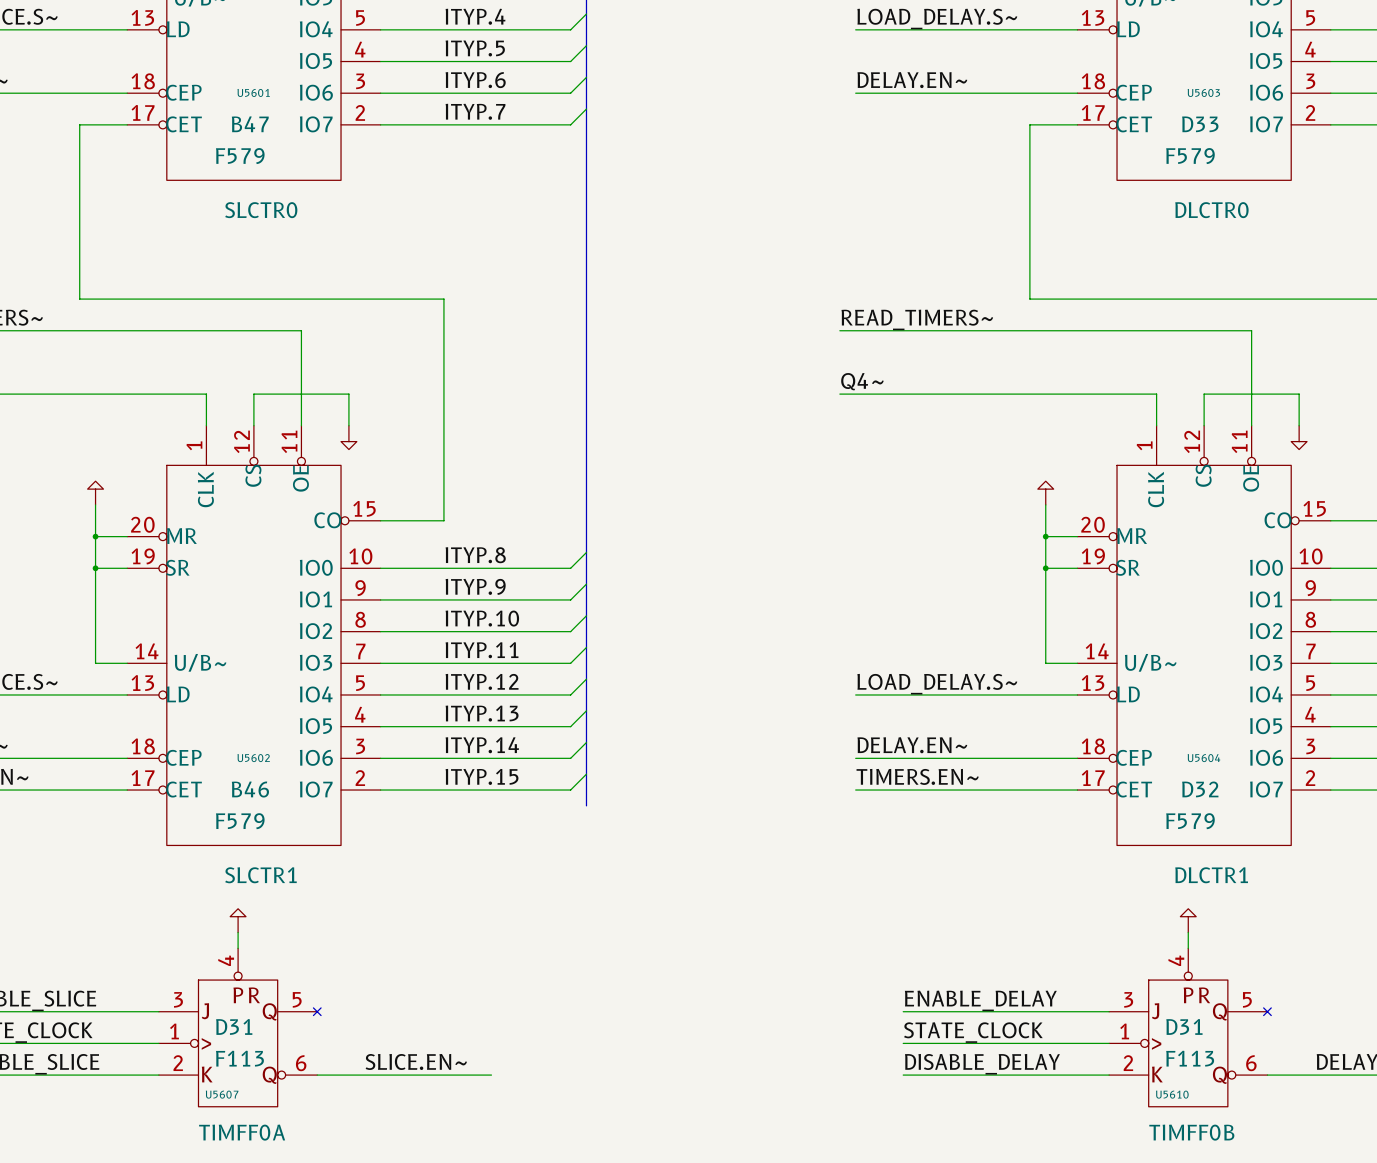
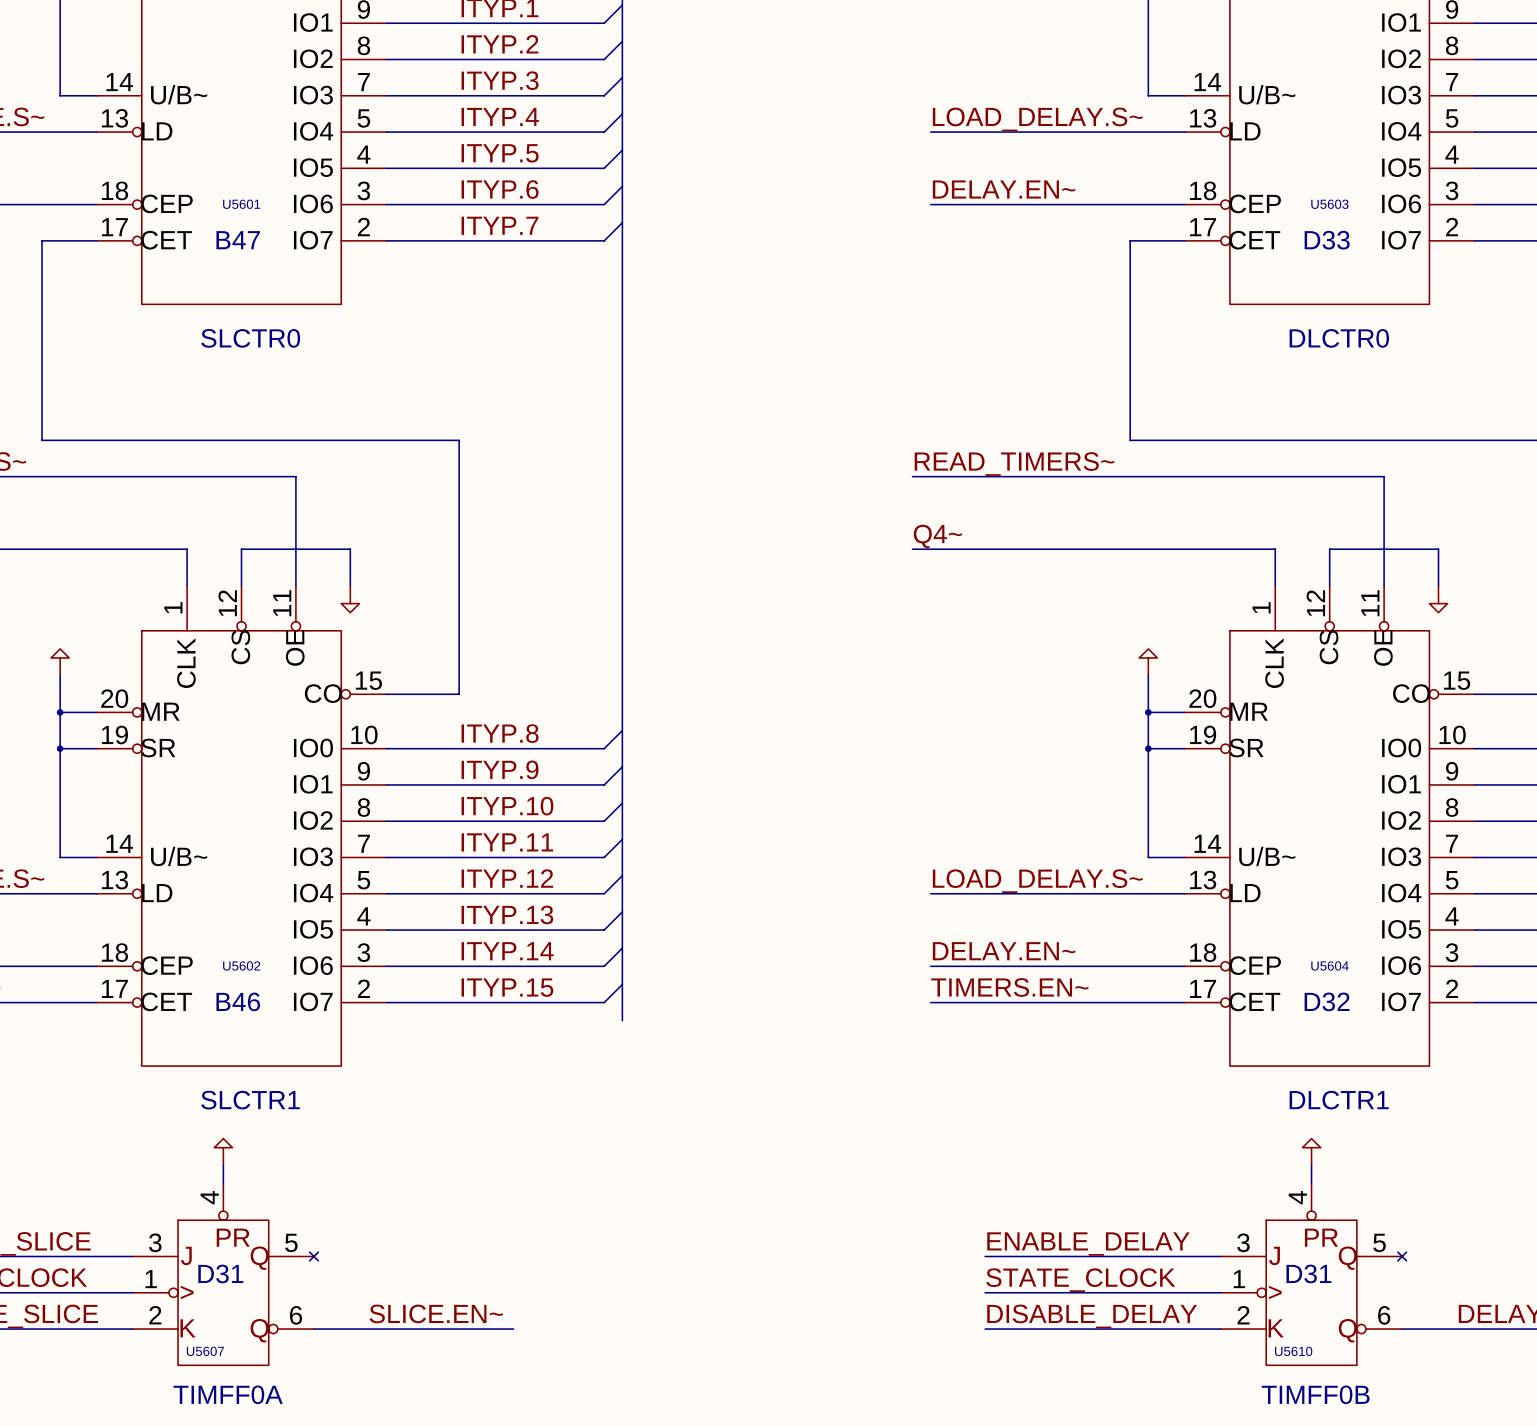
U5601 value: F579 (240, 156) -> none
U5603 value: F579 (1190, 156) -> none
U5602 value: F579 (240, 821) -> none
U5604 value: F579 (1190, 821) -> none
U5607 value: F113 (239, 1058) -> none
U5610 value: F113 (1190, 1058) -> none

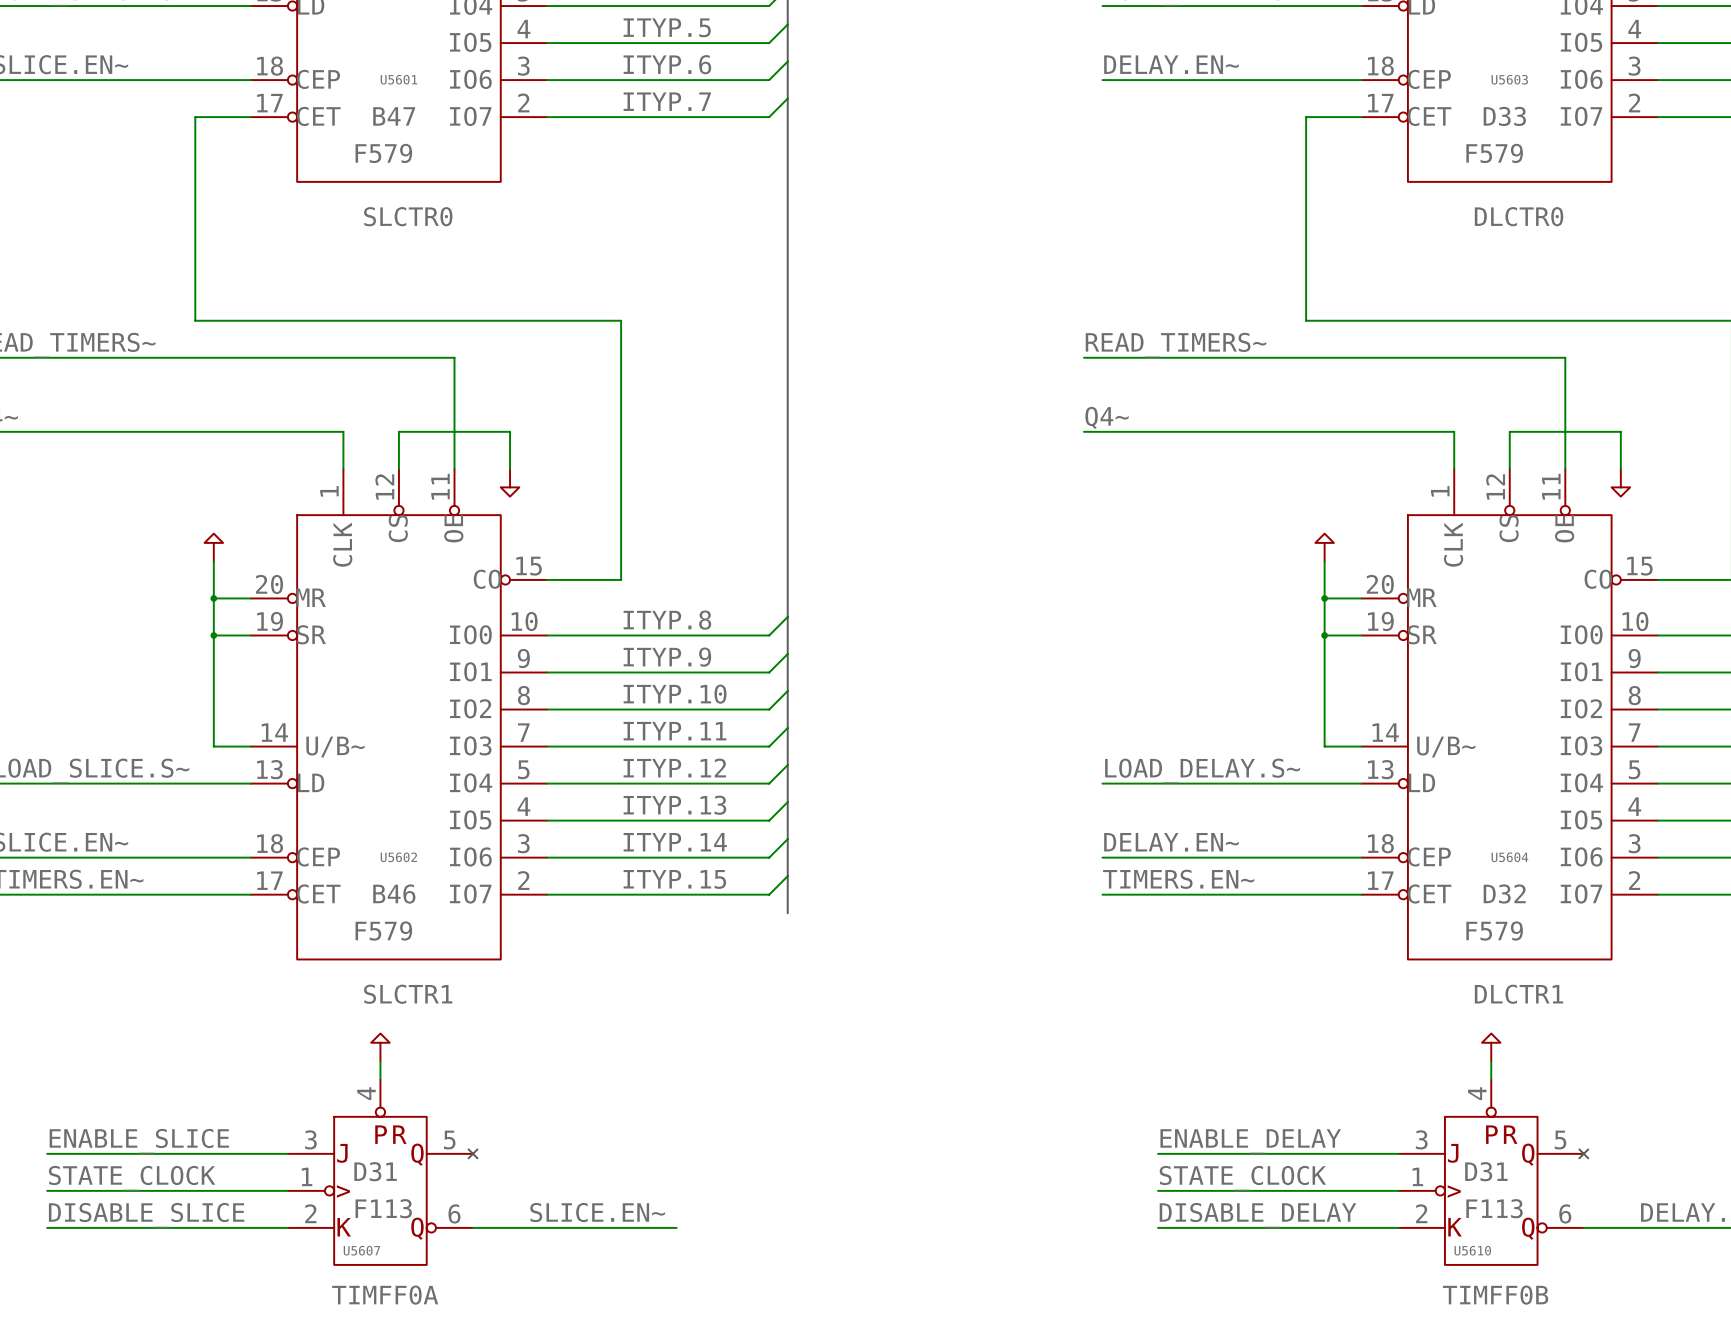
U5601 value: none -> F579 (383, 153)
U5603 value: none -> F579 (1494, 153)
U5602 value: none -> F579 (383, 931)
U5604 value: none -> F579 (1494, 931)
U5607 value: none -> F113 (383, 1208)
U5610 value: none -> F113 (1494, 1208)

